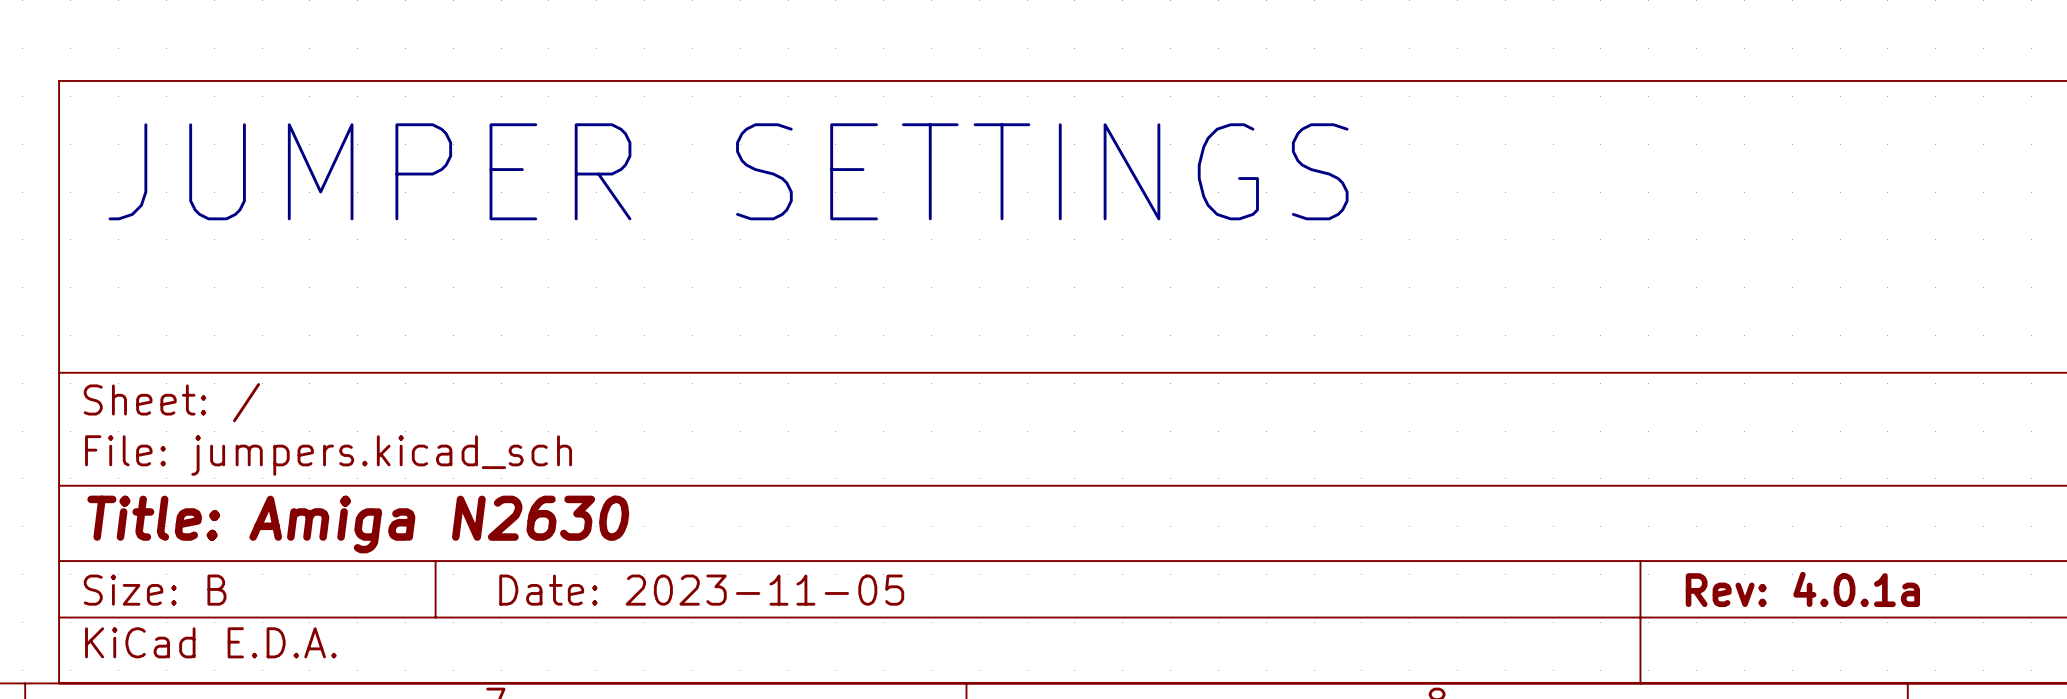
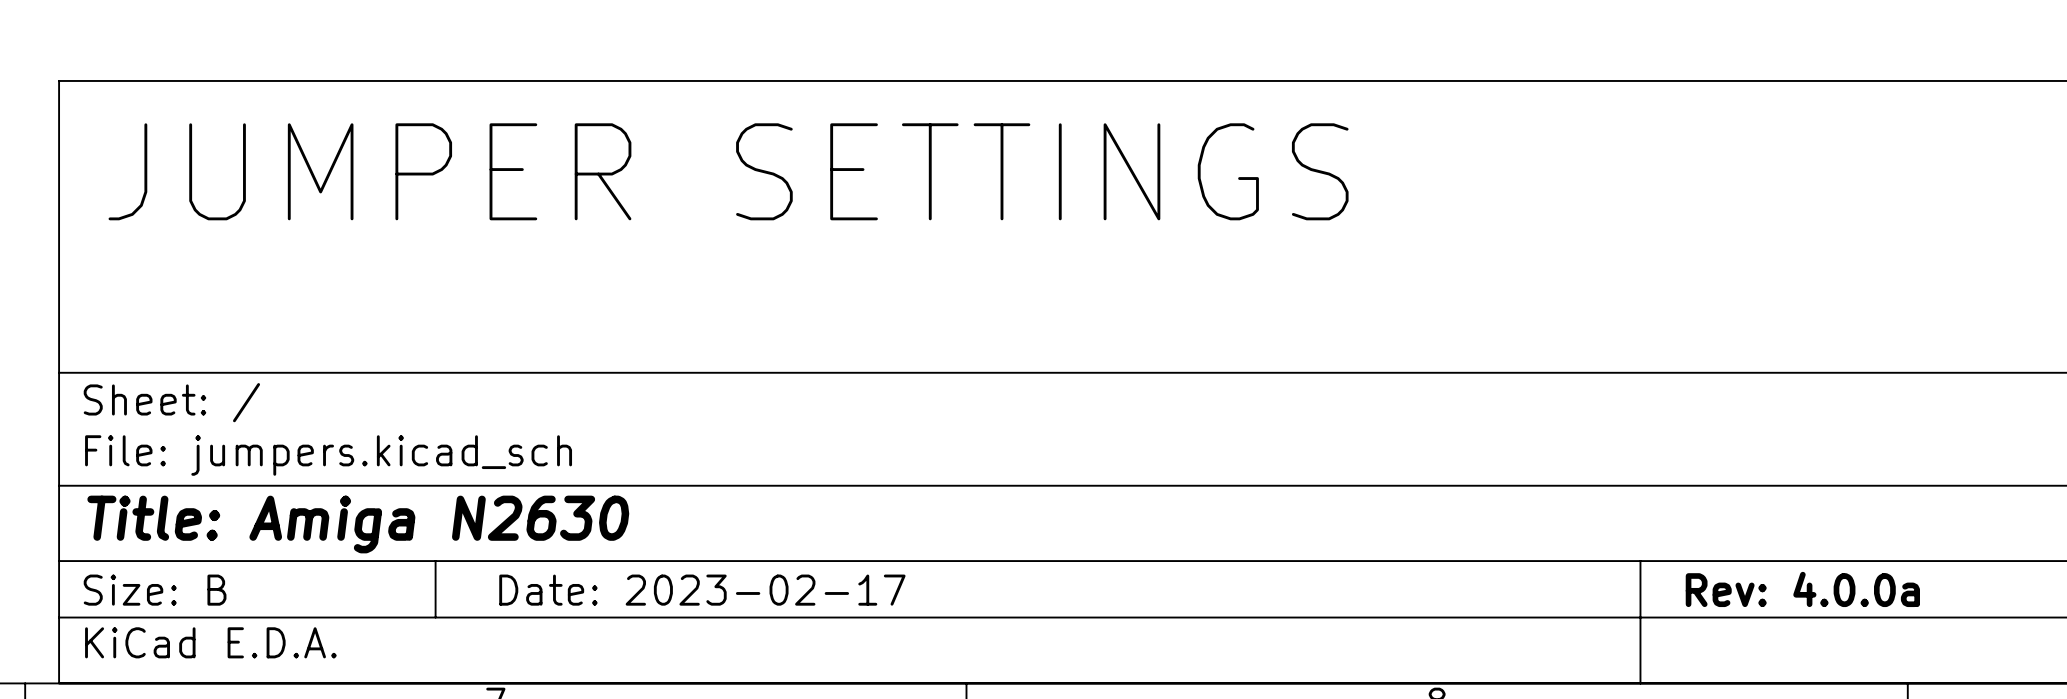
title block: Rev: 4.0.1a (1802, 589) -> Rev: 4.0.0a (1802, 589)
title block: Date: 2023-11-05 (701, 590) -> Date: 2023-02-17 (702, 590)

